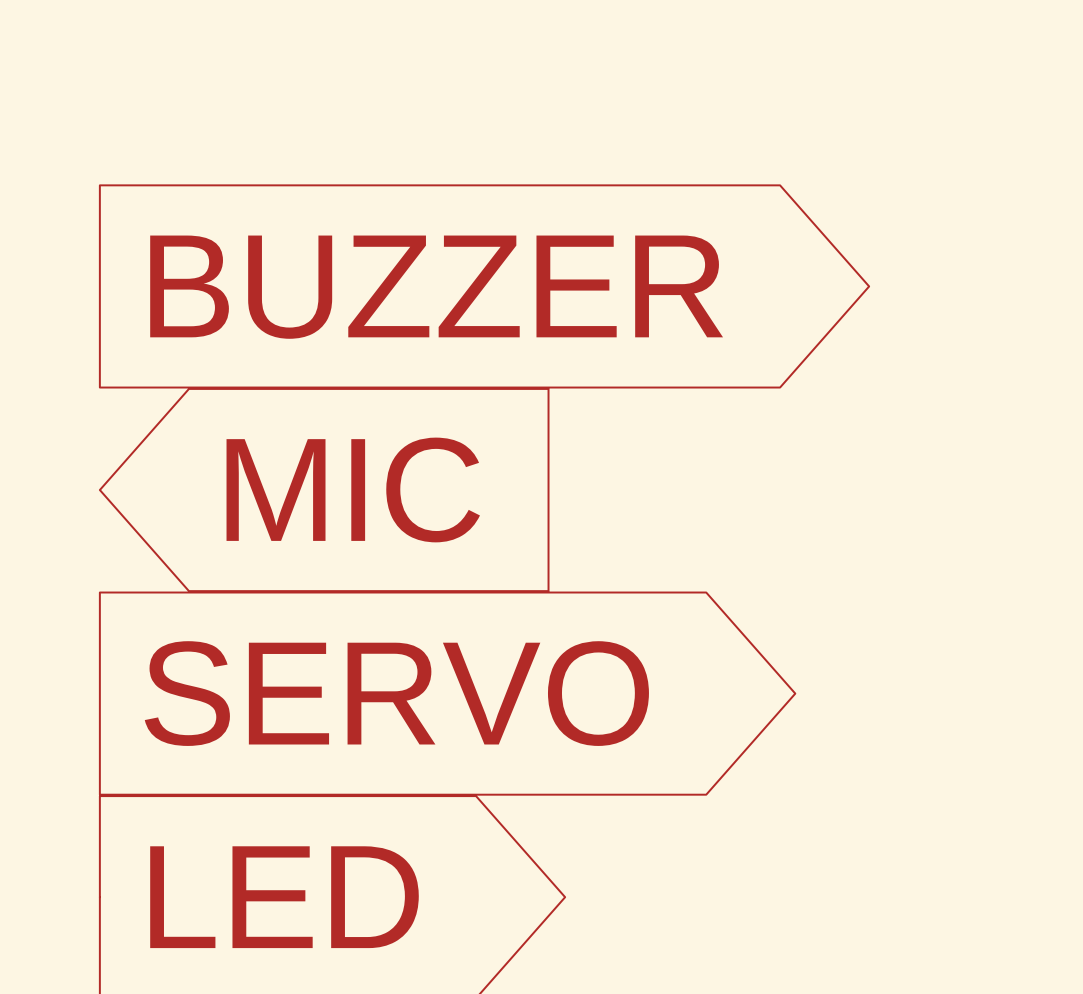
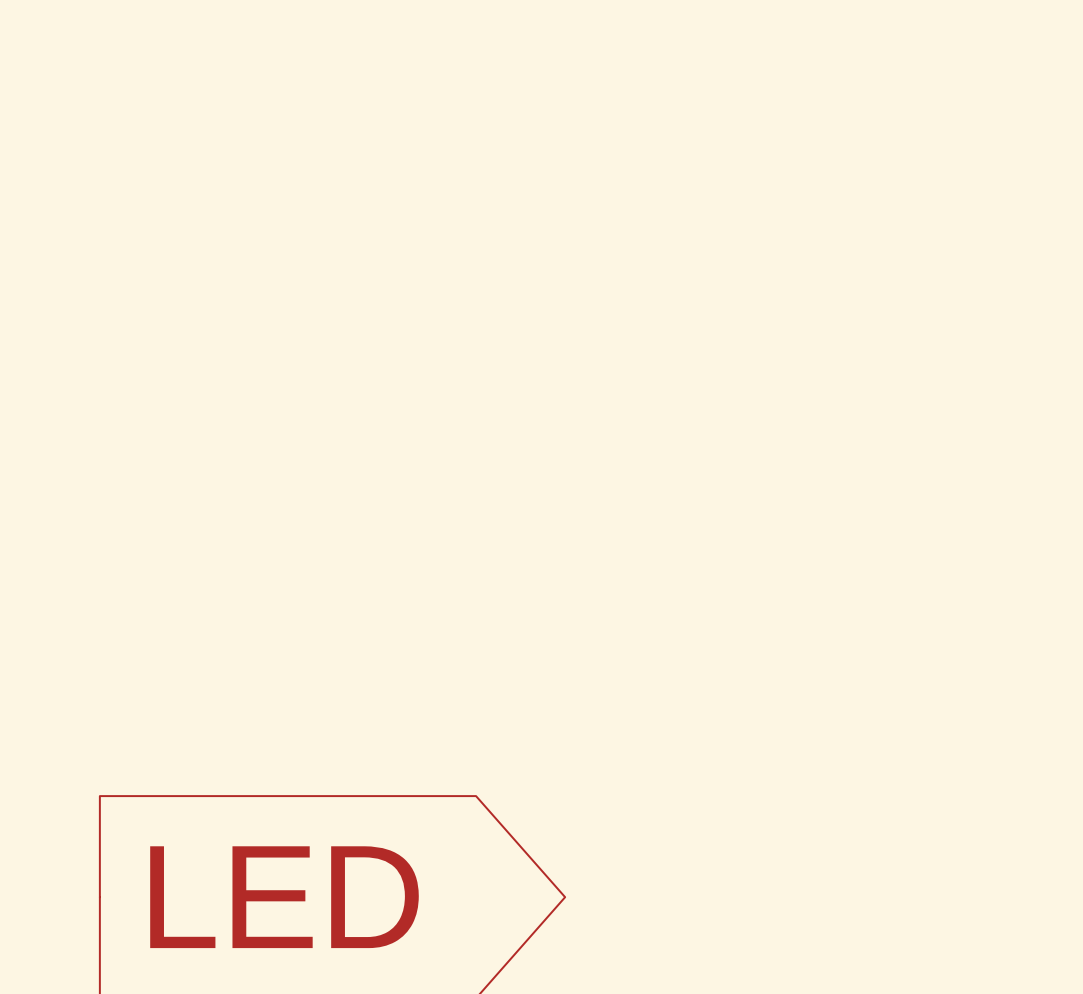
global label: BUZZER (436, 287) -> none
global label: MIC (353, 489) -> none
global label: SERVO (396, 693) -> none

